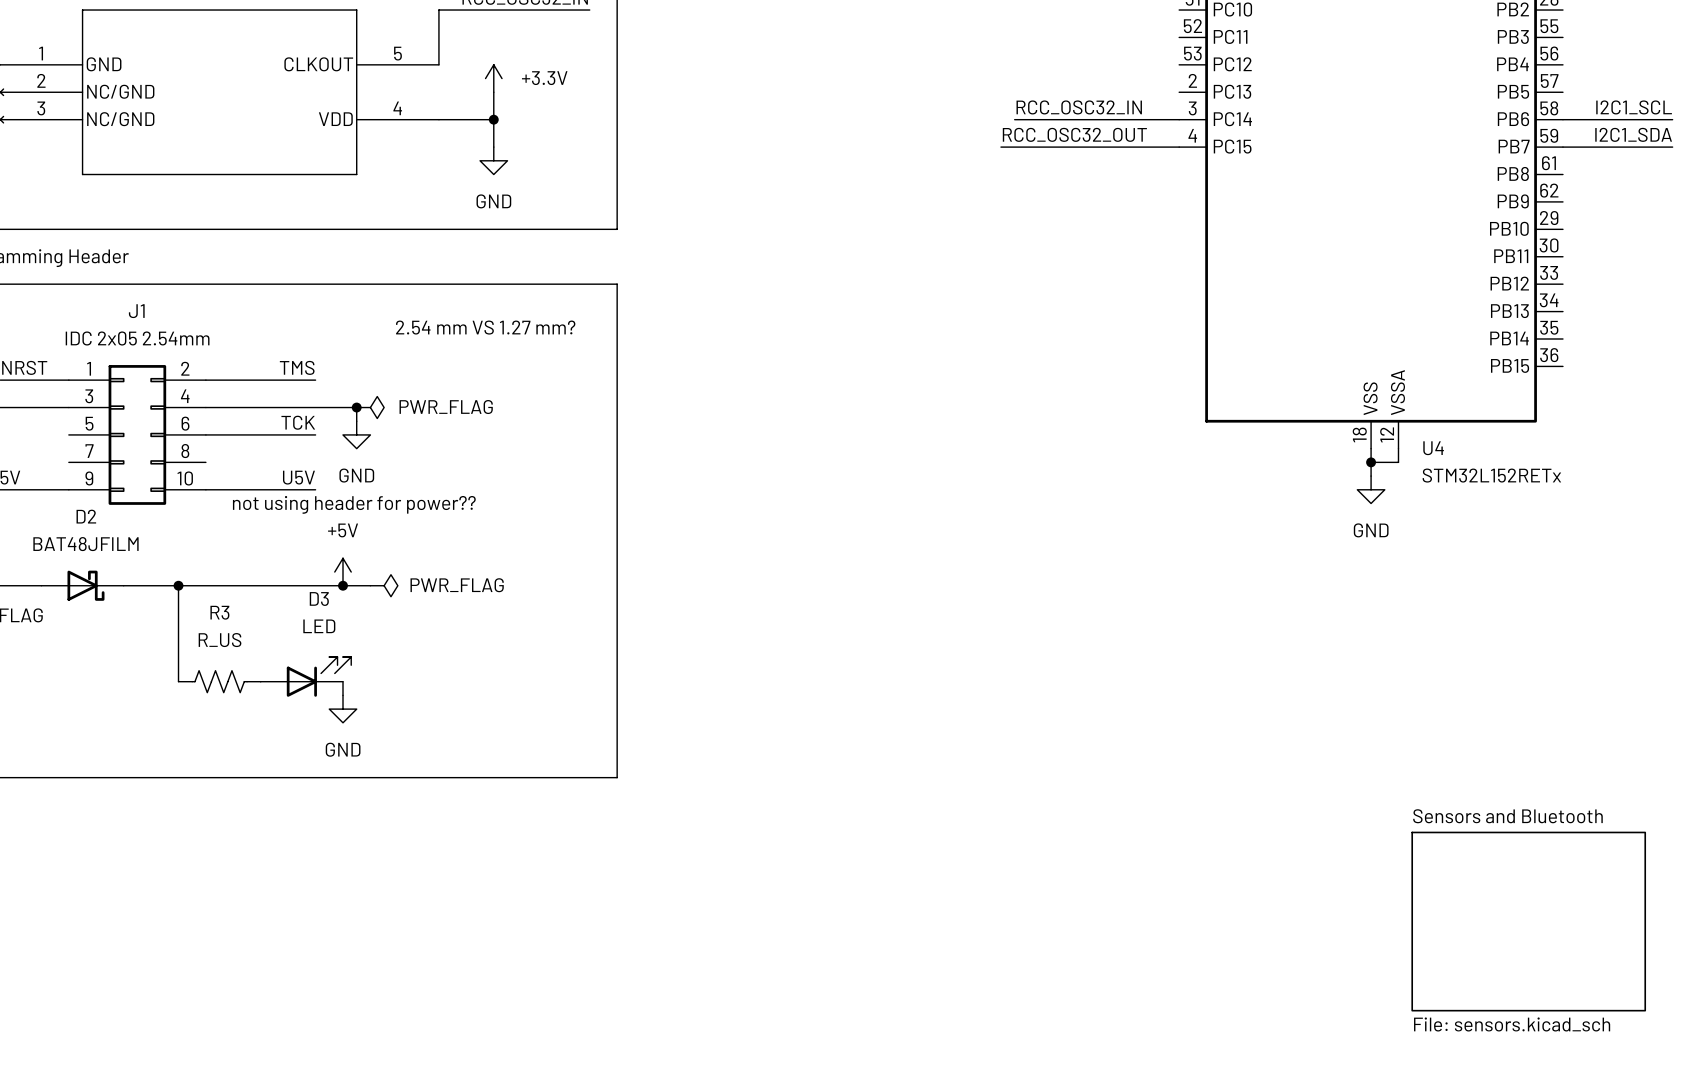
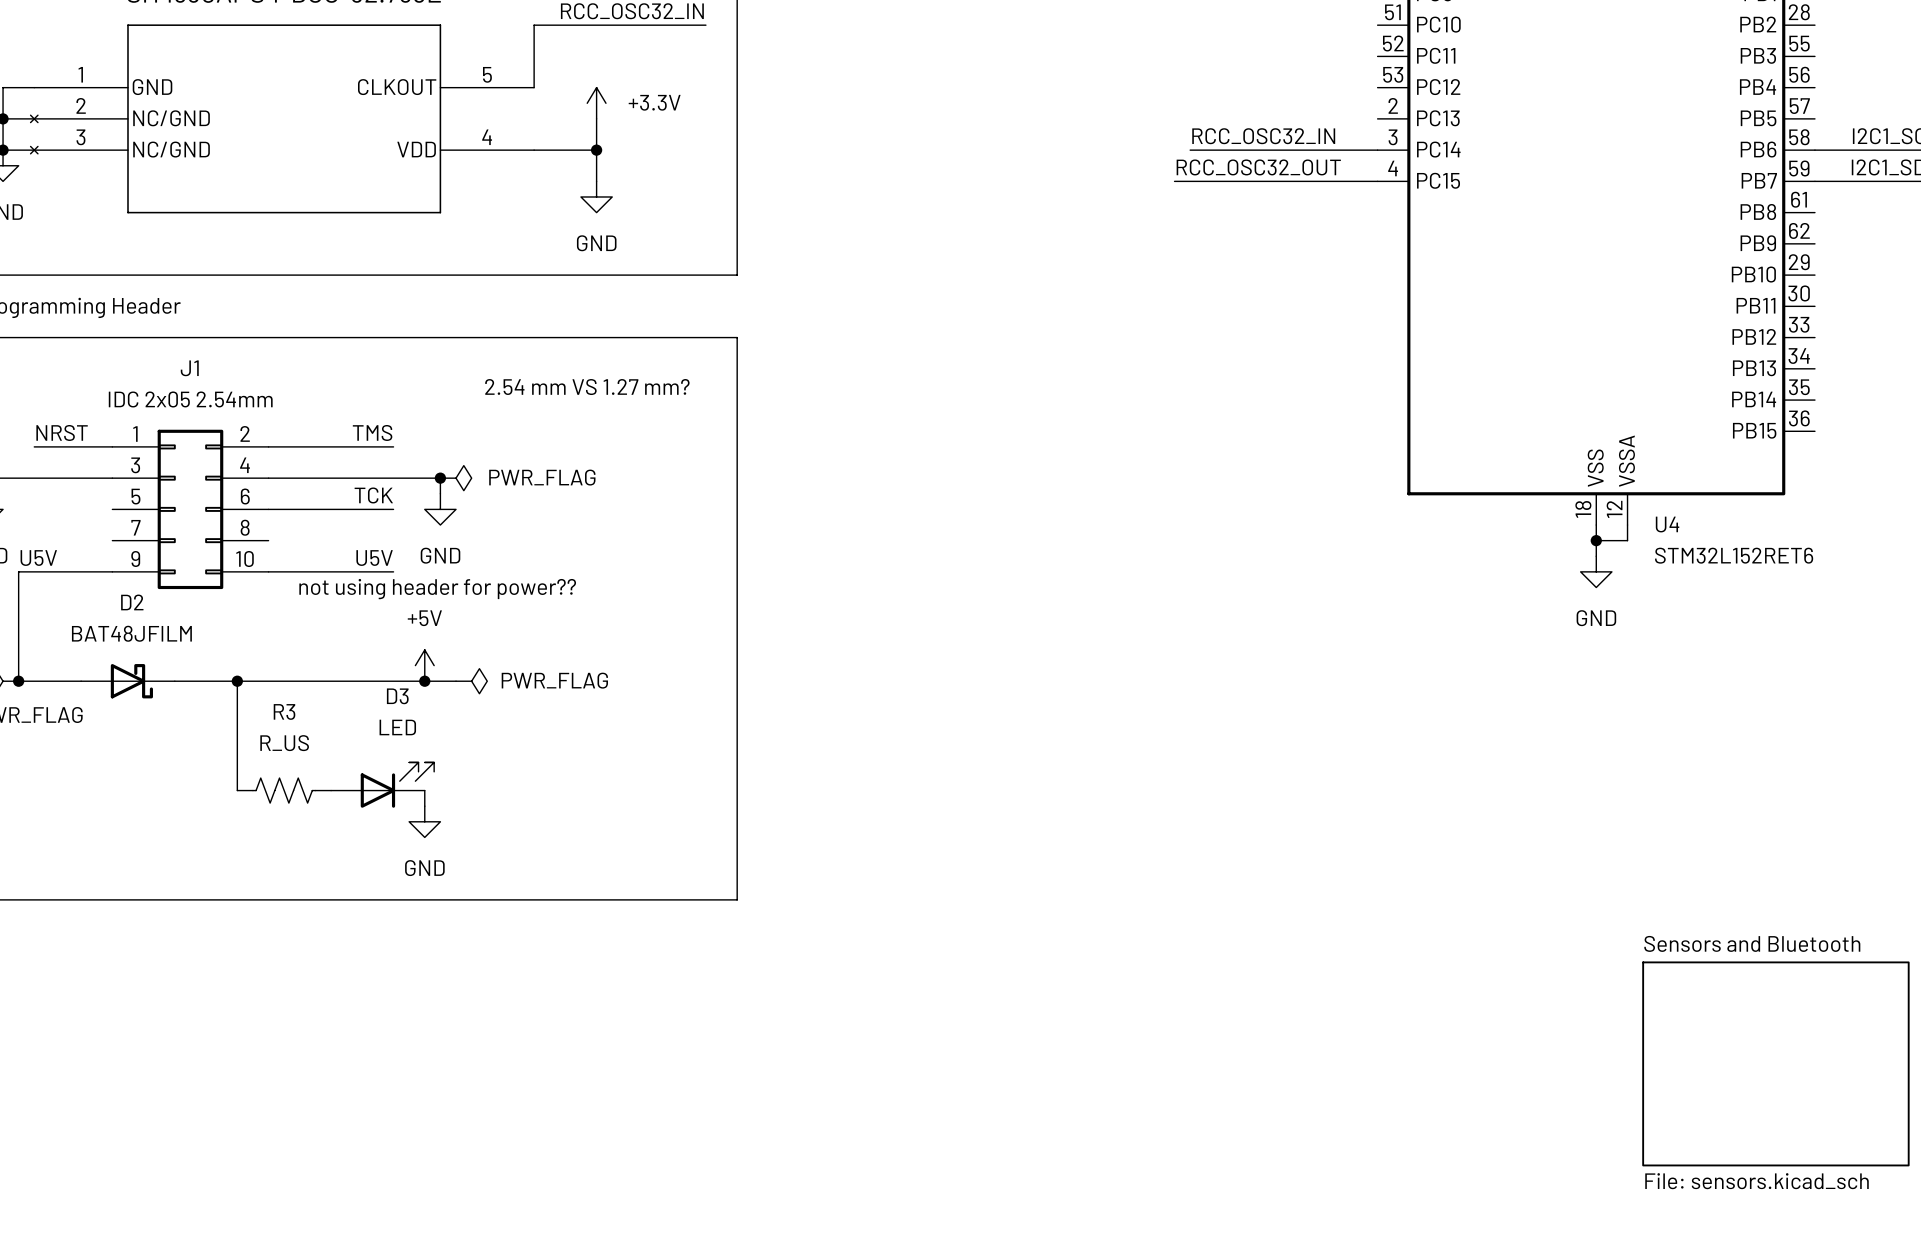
U4 value: STM32L152RETx (1491, 475) -> STM32L152RET6 (1734, 555)

